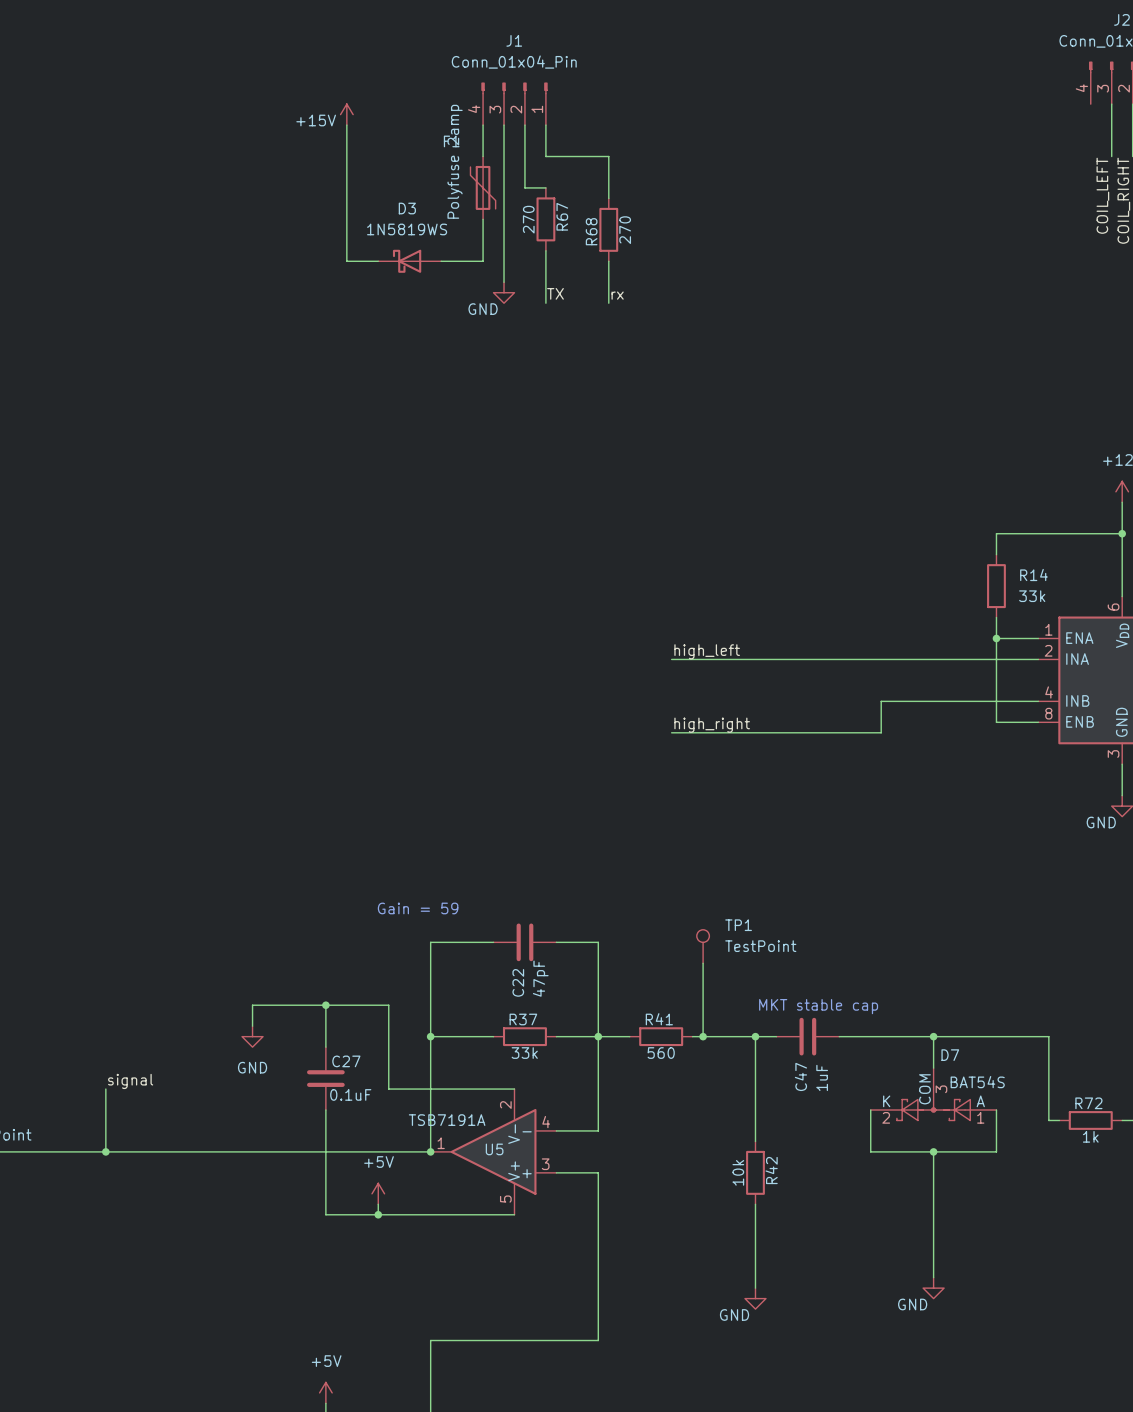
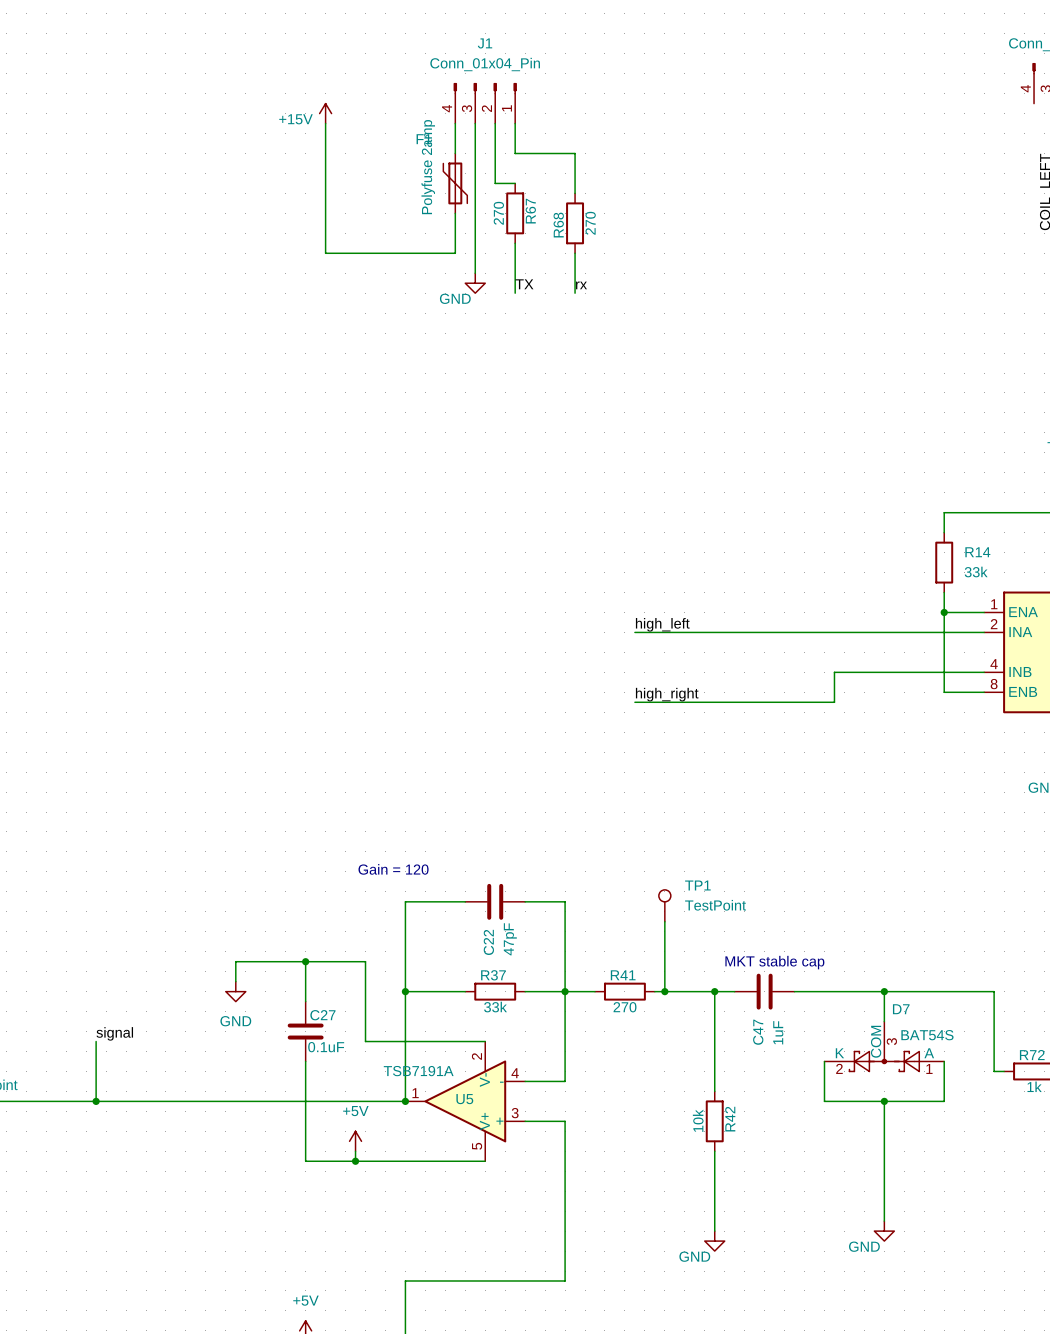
D3: 1N5819WS (409, 261) -> none
text: Gain = 59 (418, 908) -> Gain = 120 (393, 869)
R41 value: 560 (661, 1053) -> 270 (625, 1007)

